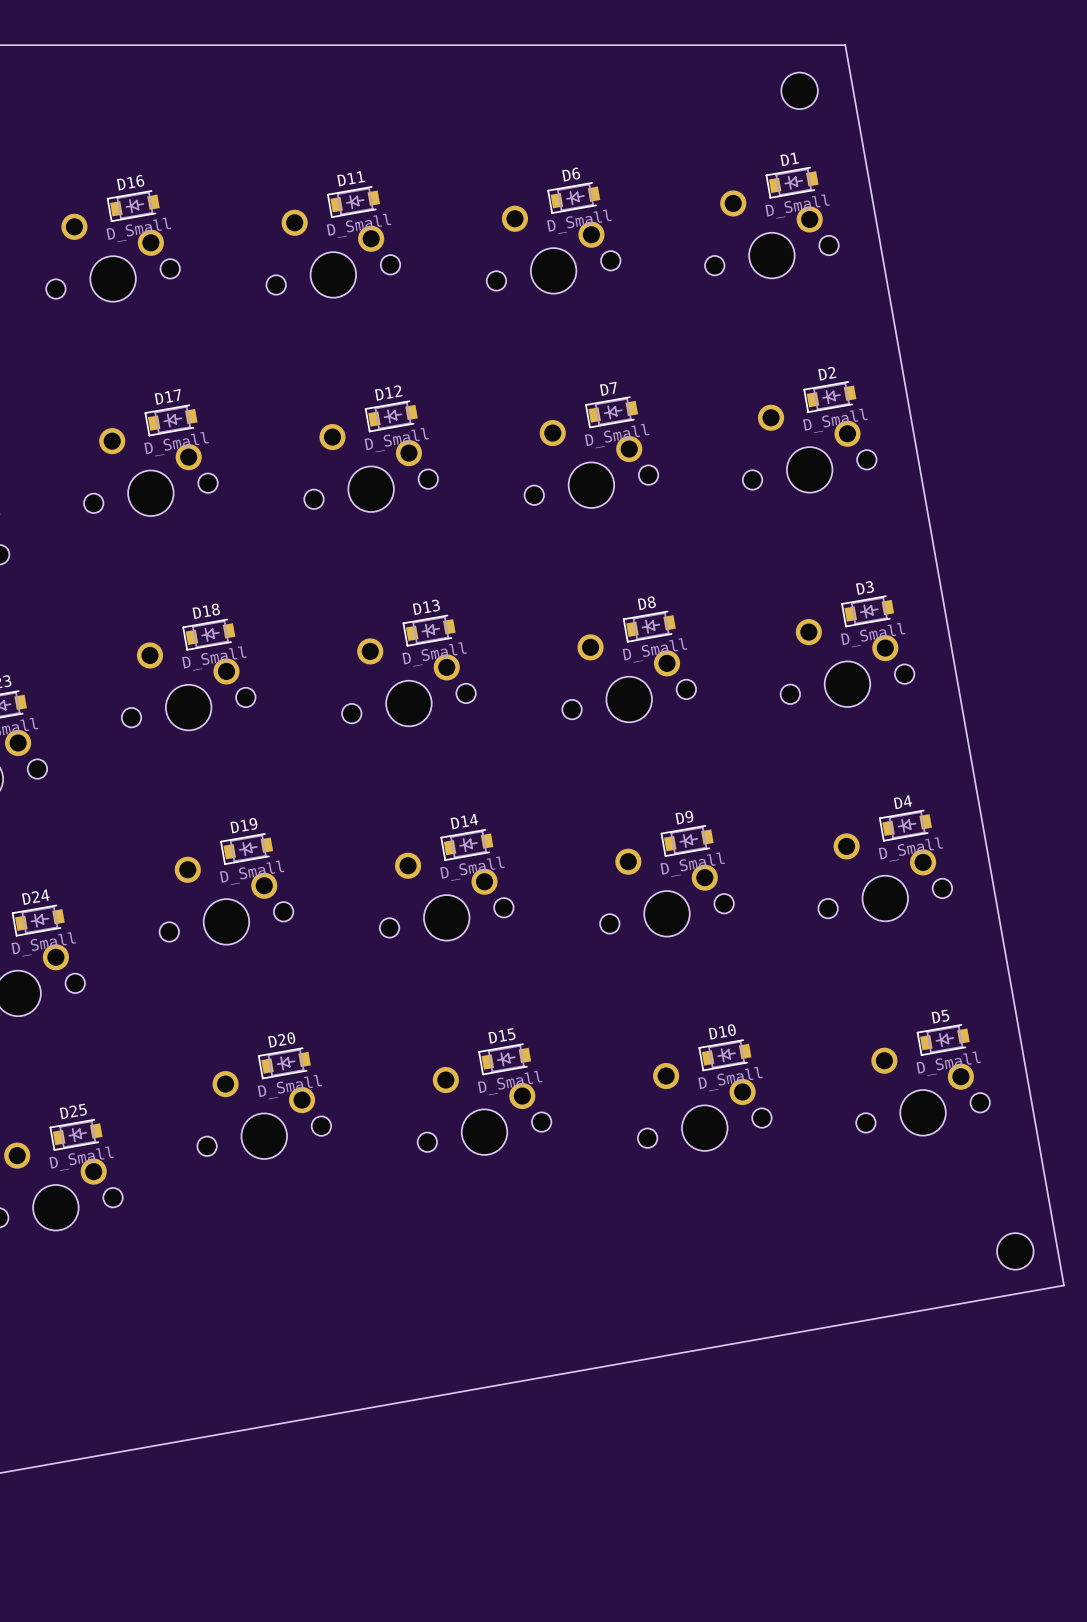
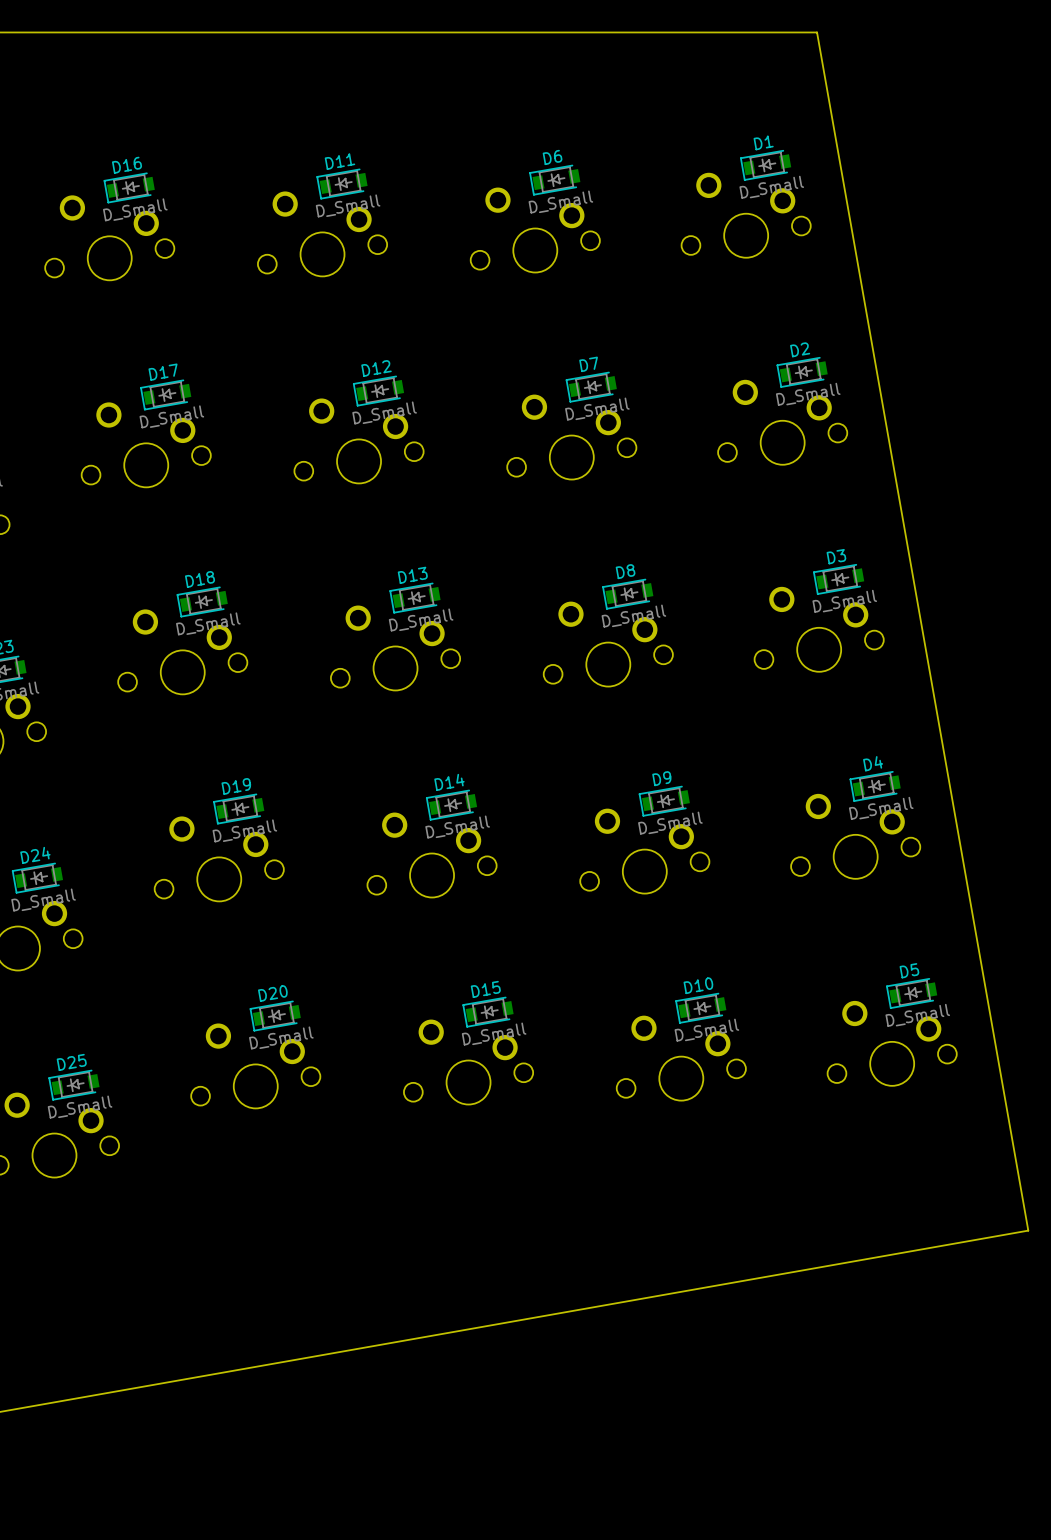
part: (799, 90) -> none
part: (1015, 1251) -> none

